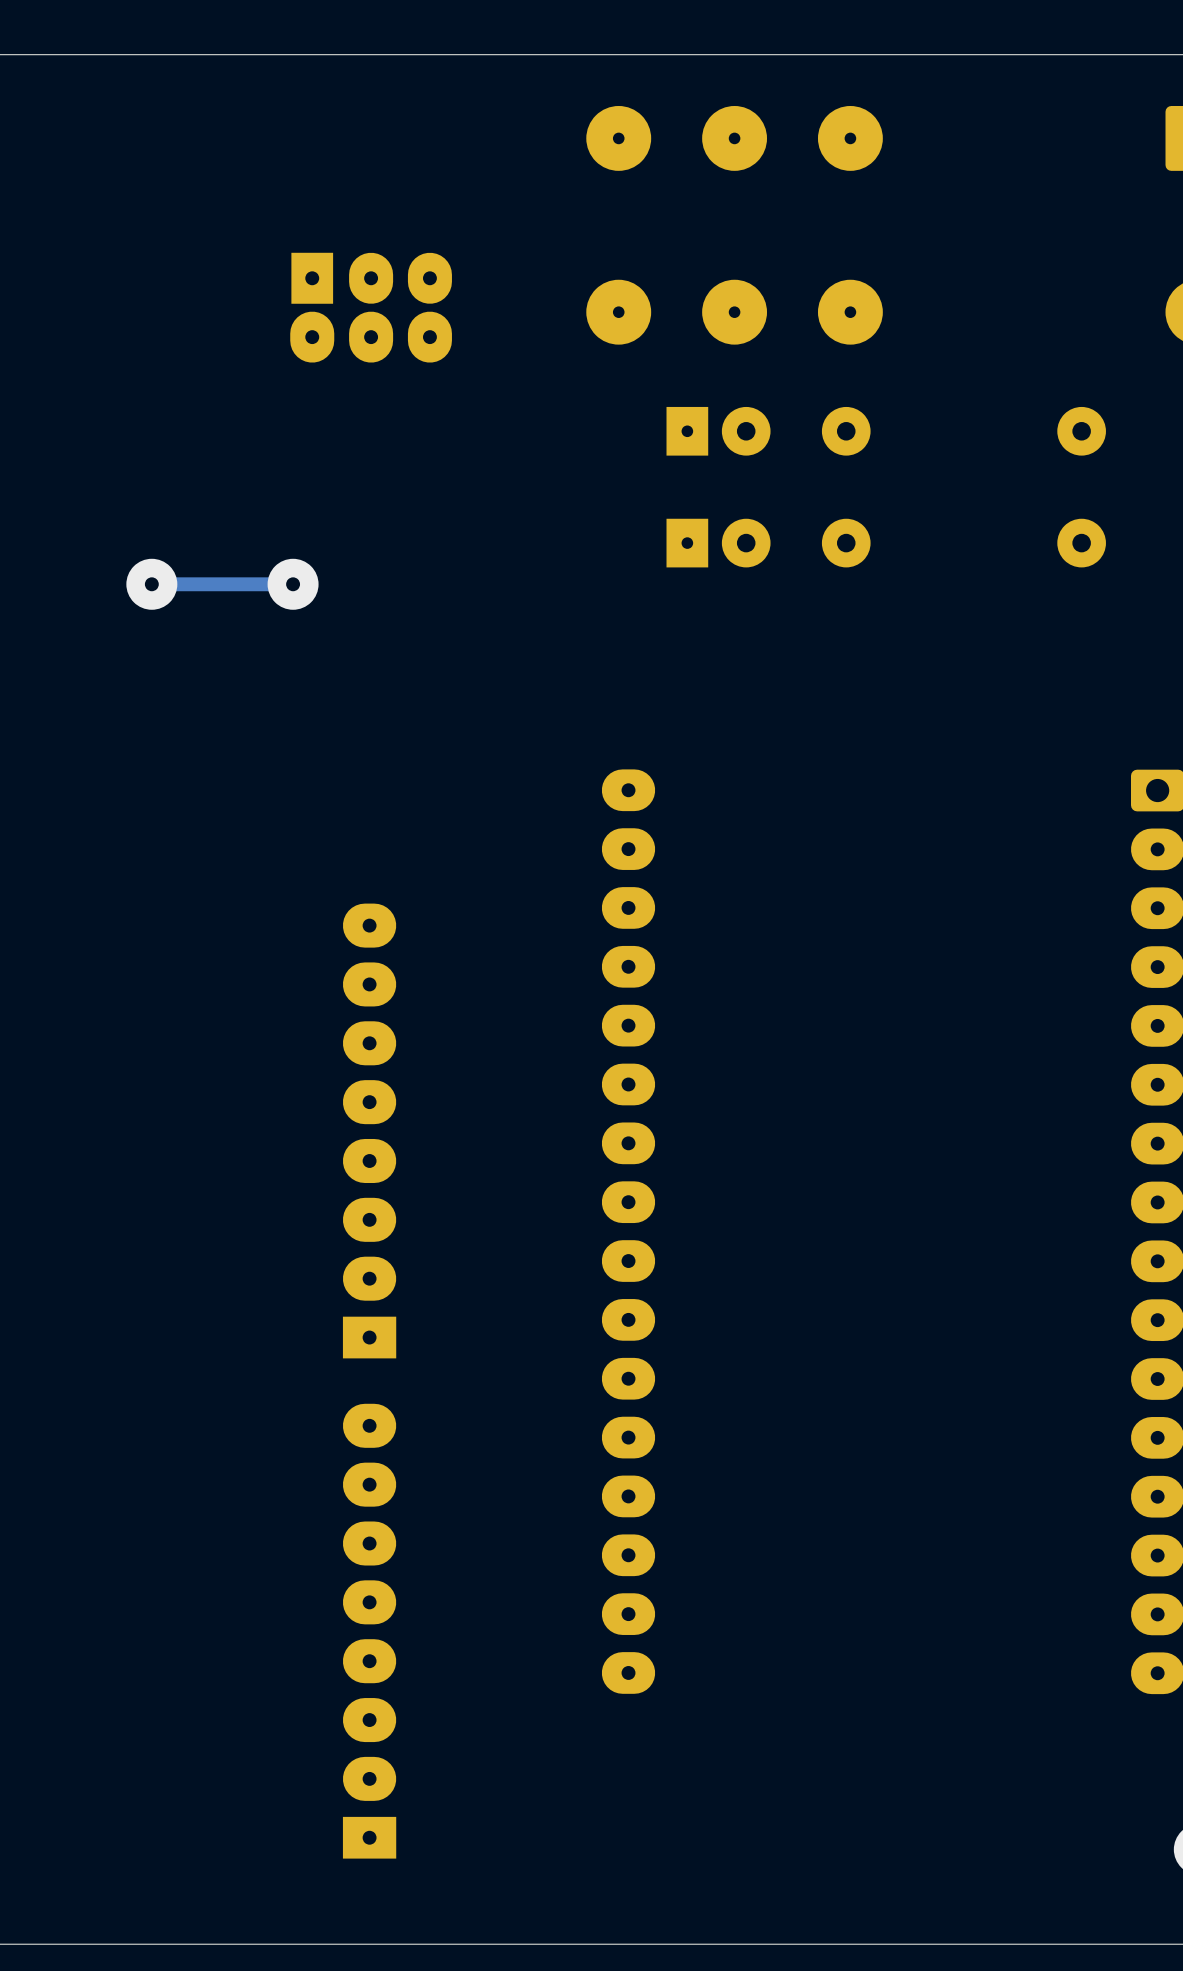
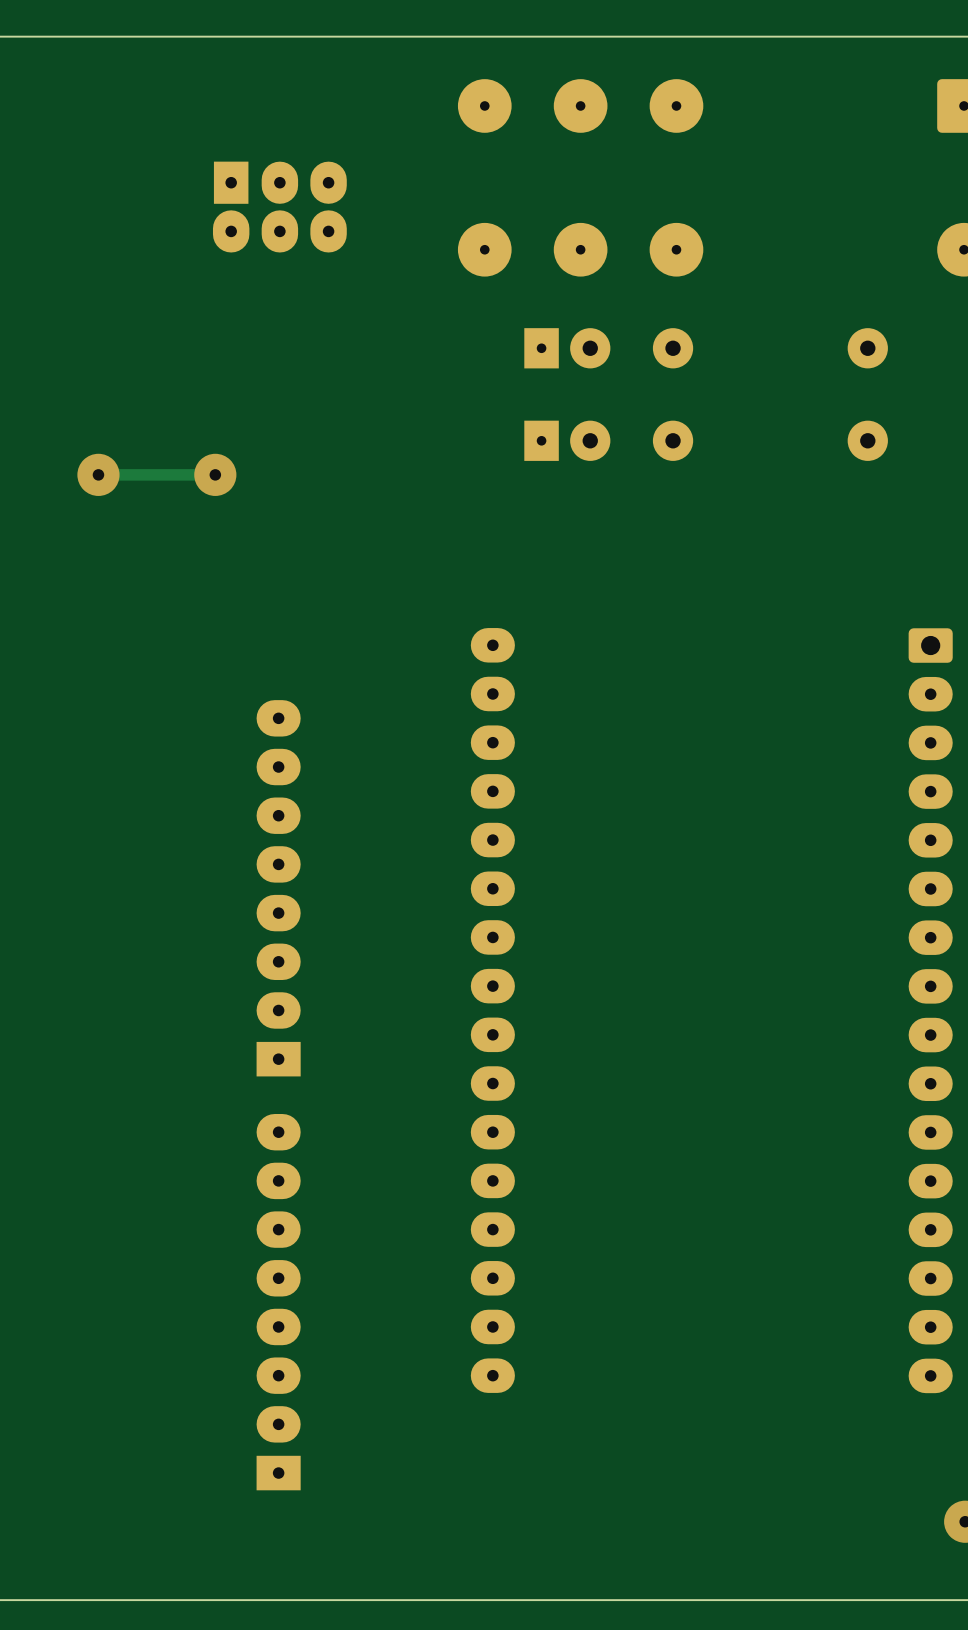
part position: (371, 307) -> (279, 207)
part position: (369, 1130) -> (278, 888)
part position: (369, 1631) -> (278, 1302)

